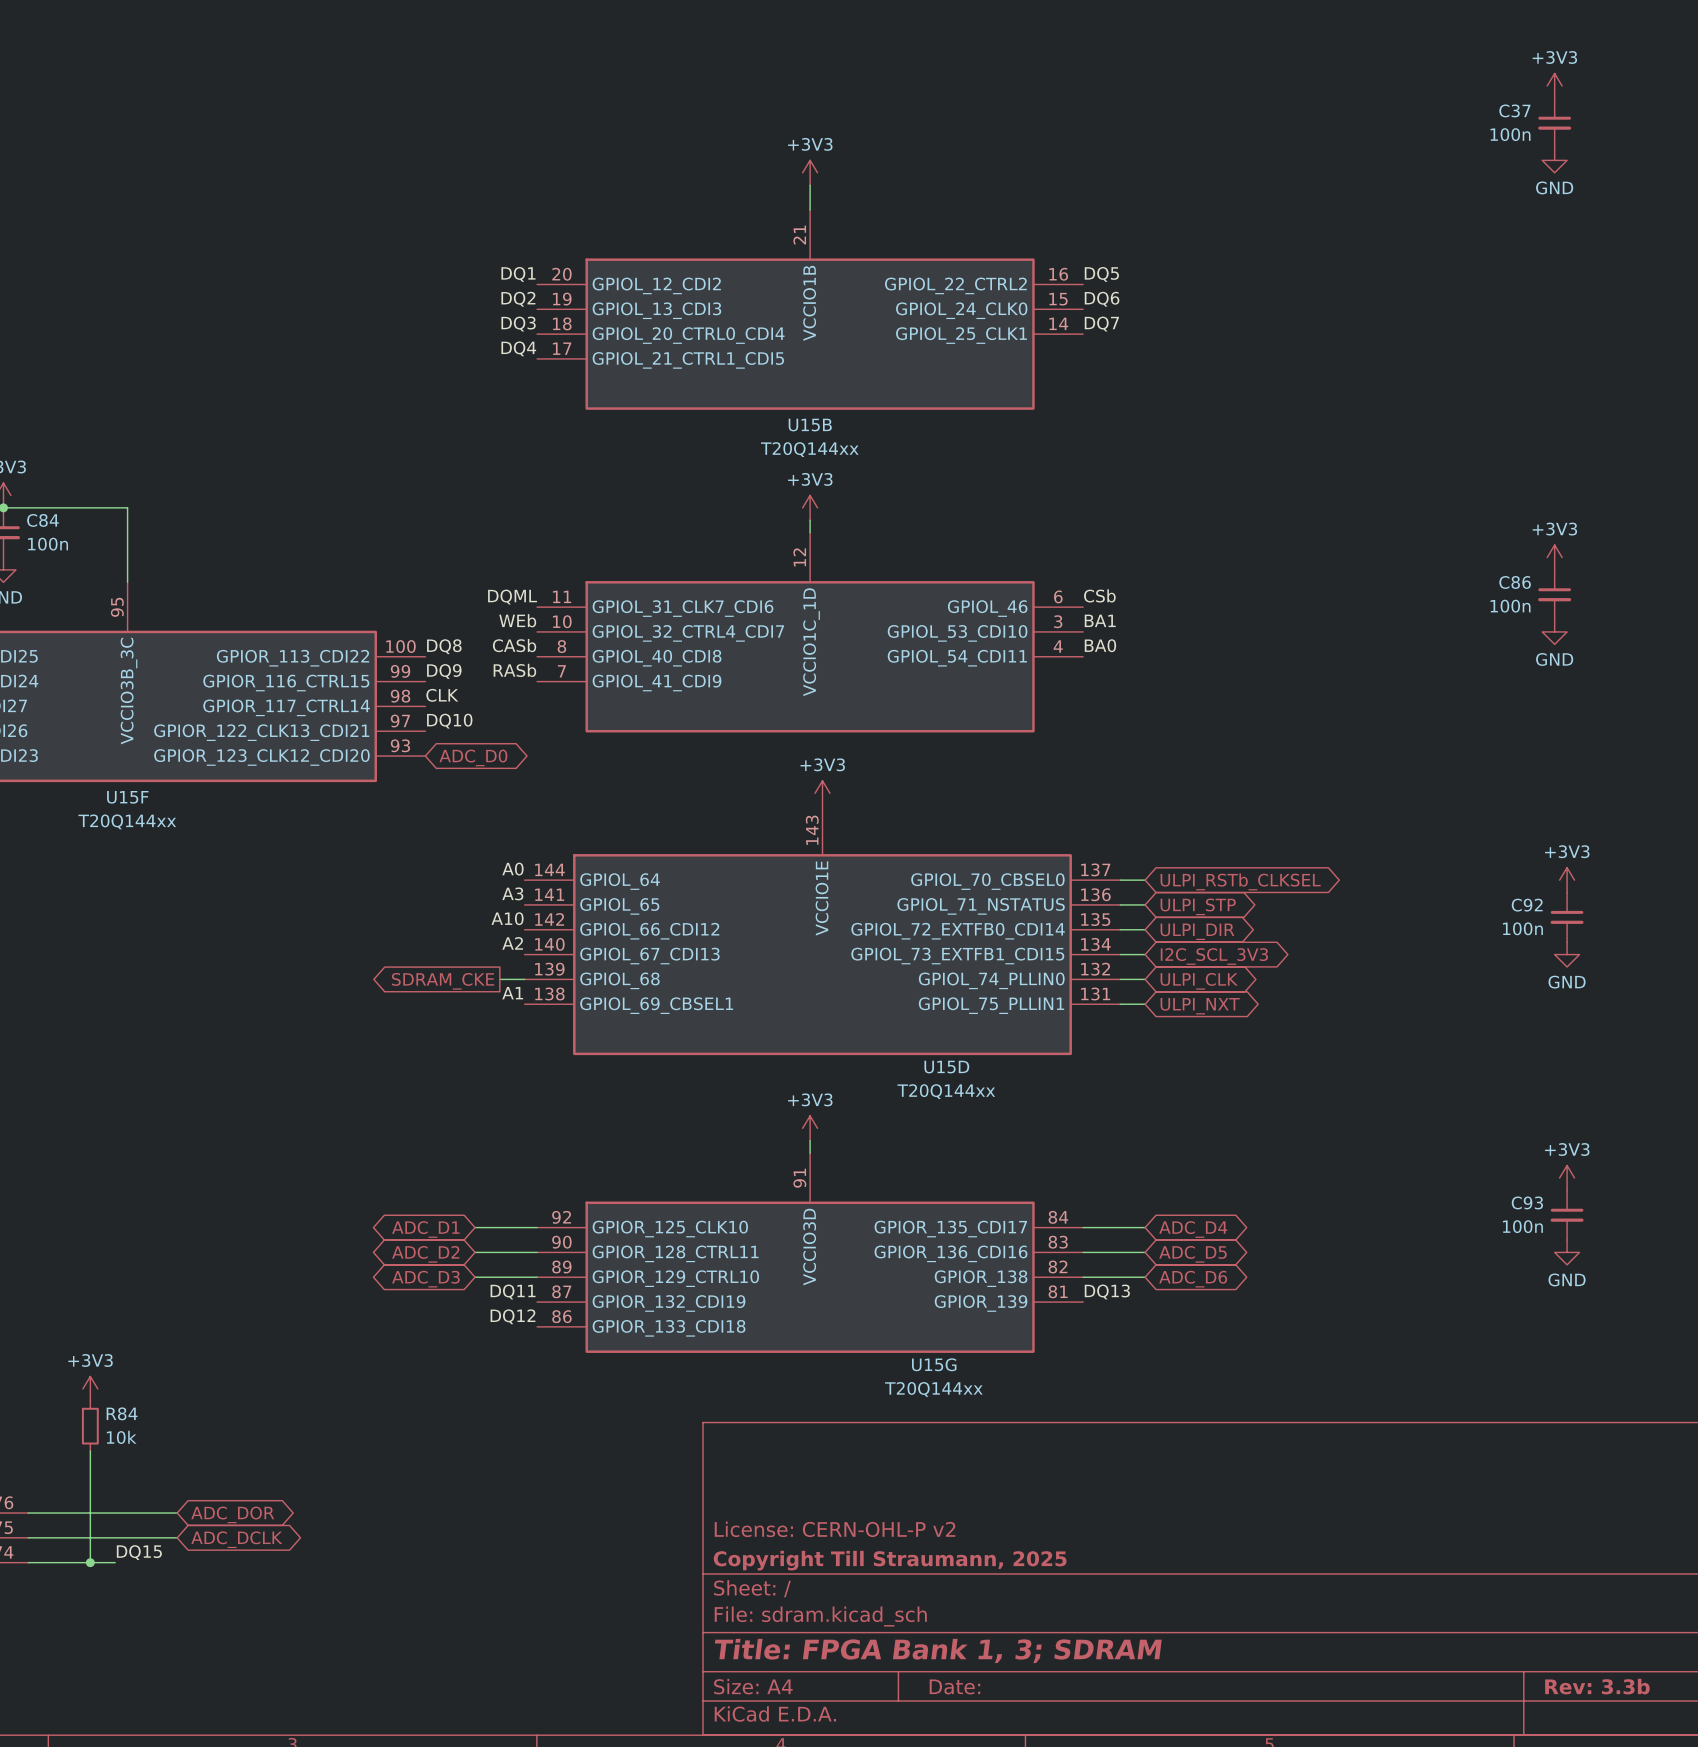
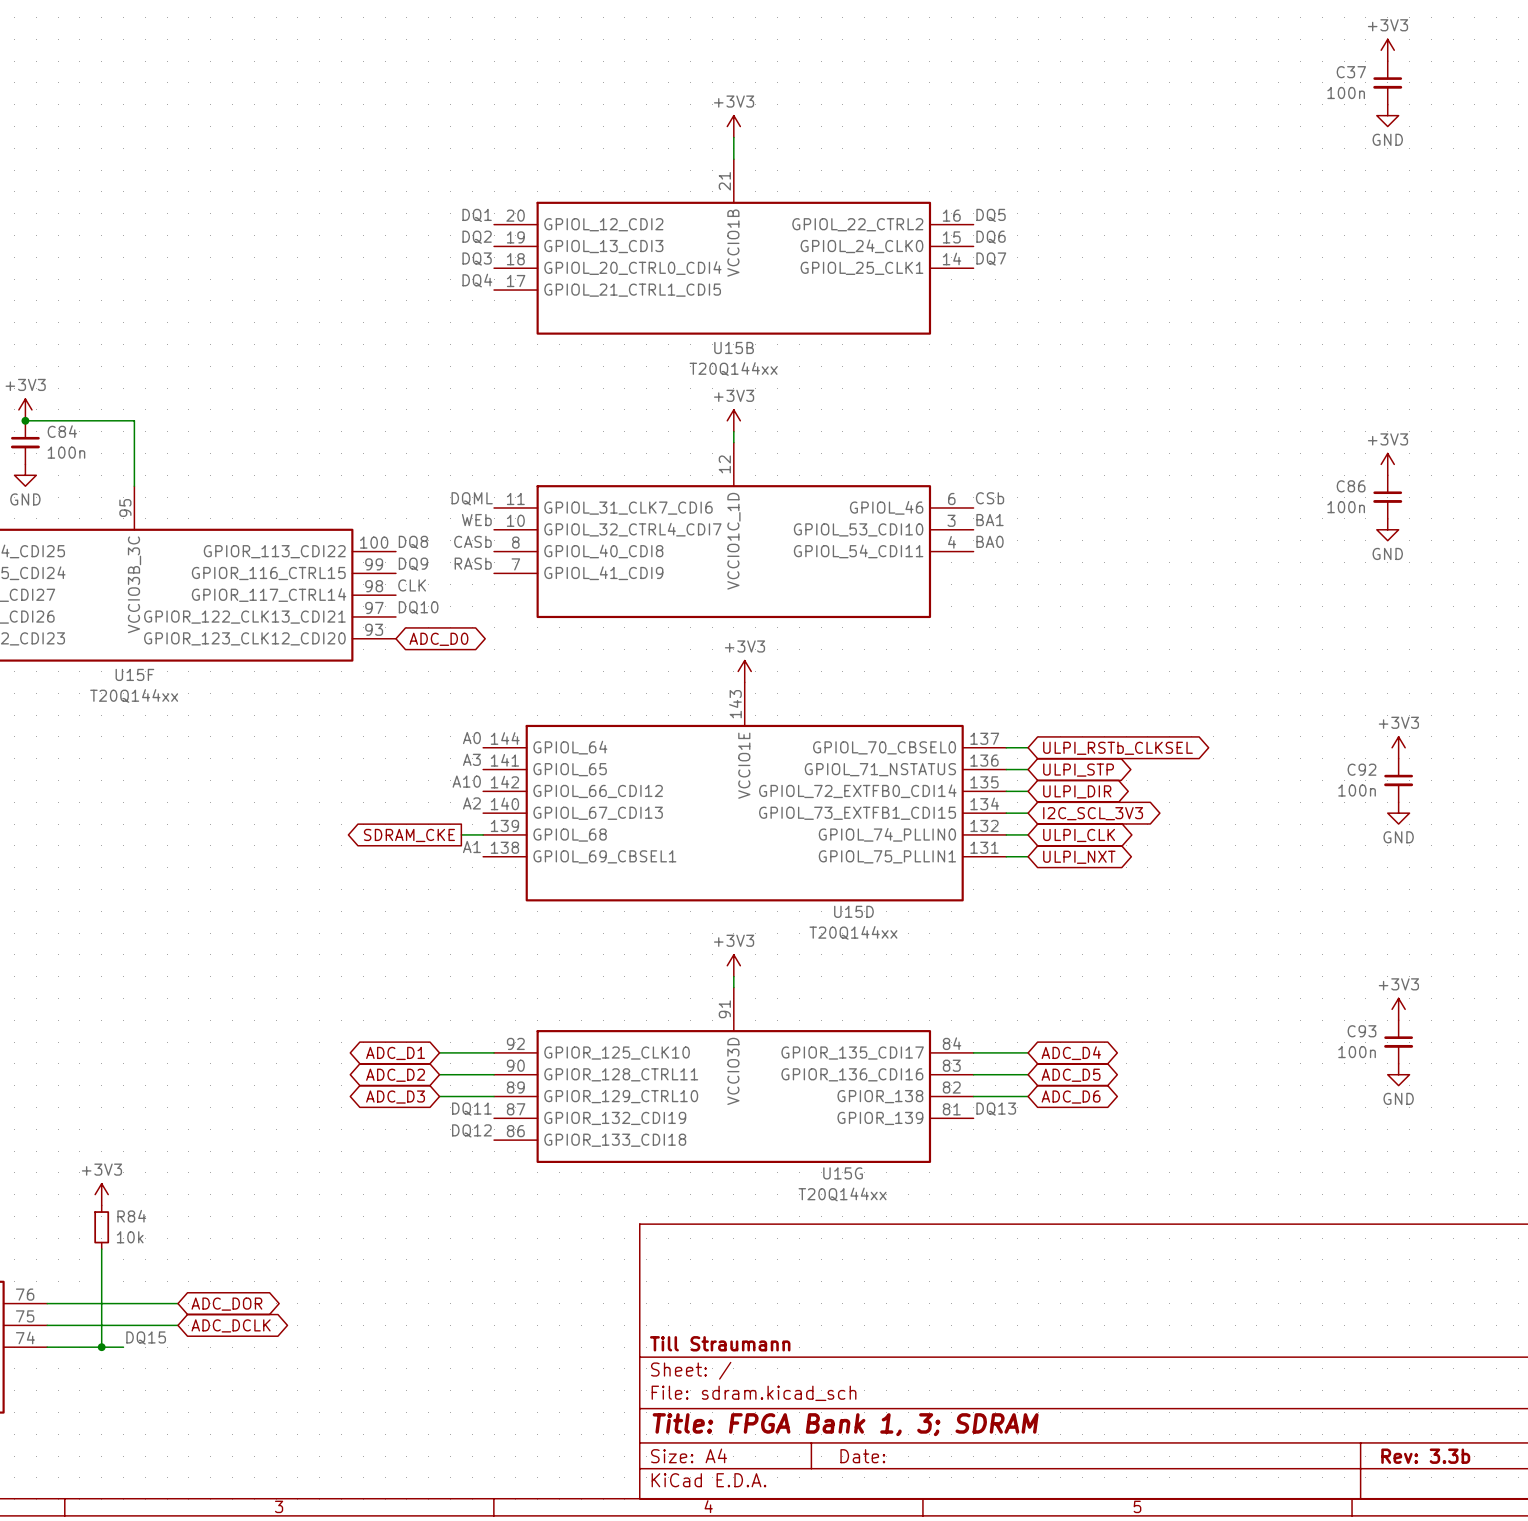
title block: License: CERN-OHL-P v2 (835, 1529) -> none
title block: Copyright Till Straumann, 2025 (890, 1560) -> Till Straumann (720, 1343)

